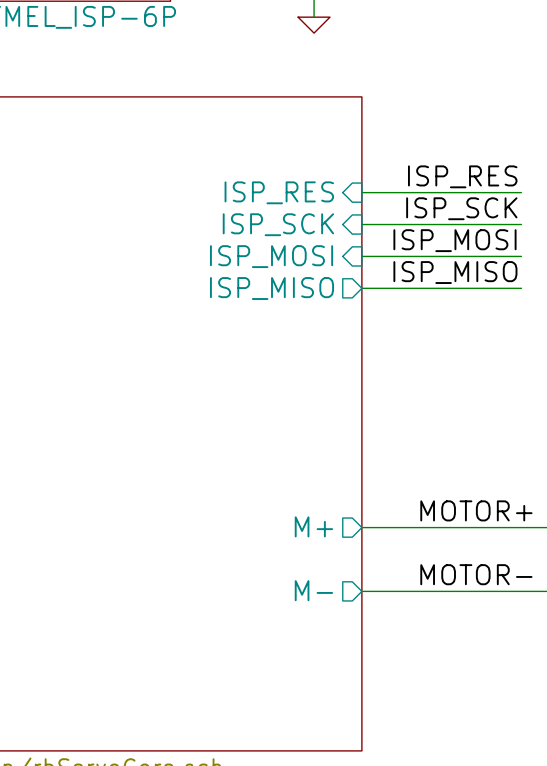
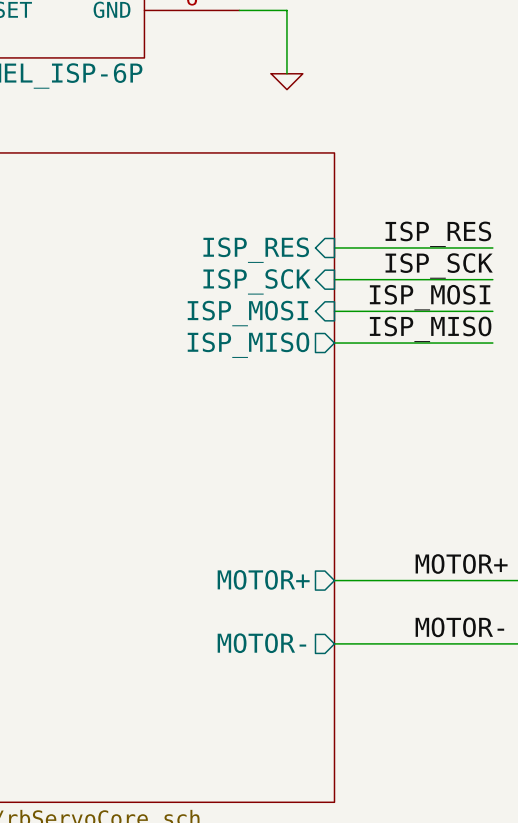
sheet pin: M+ (313, 526) -> MOTOR+ (263, 579)
sheet pin: M- (313, 590) -> MOTOR- (261, 643)

